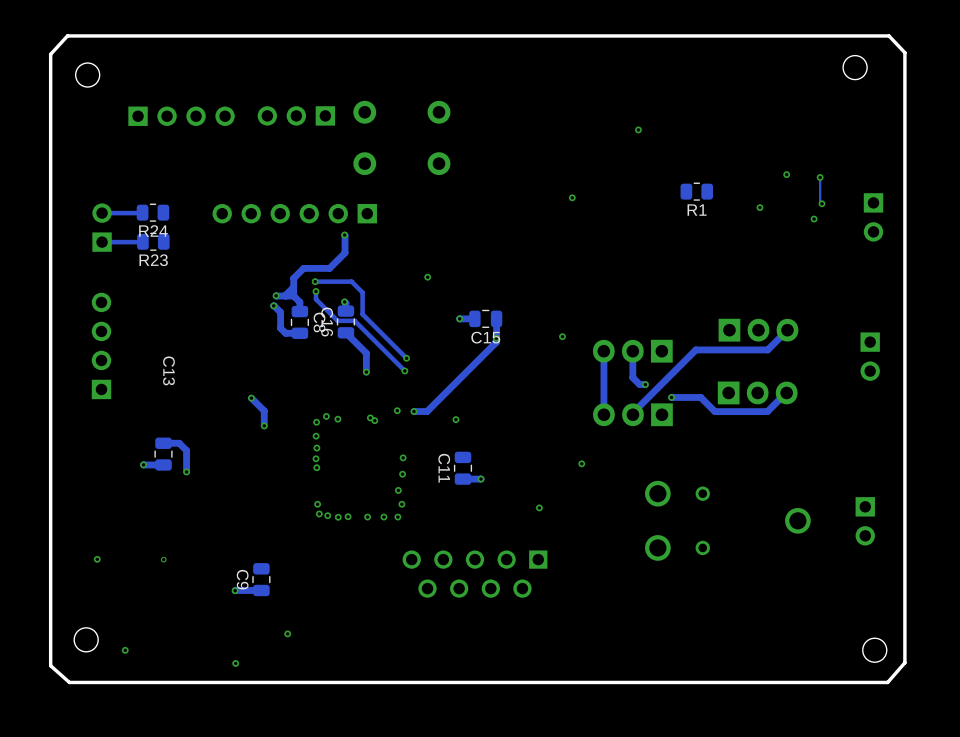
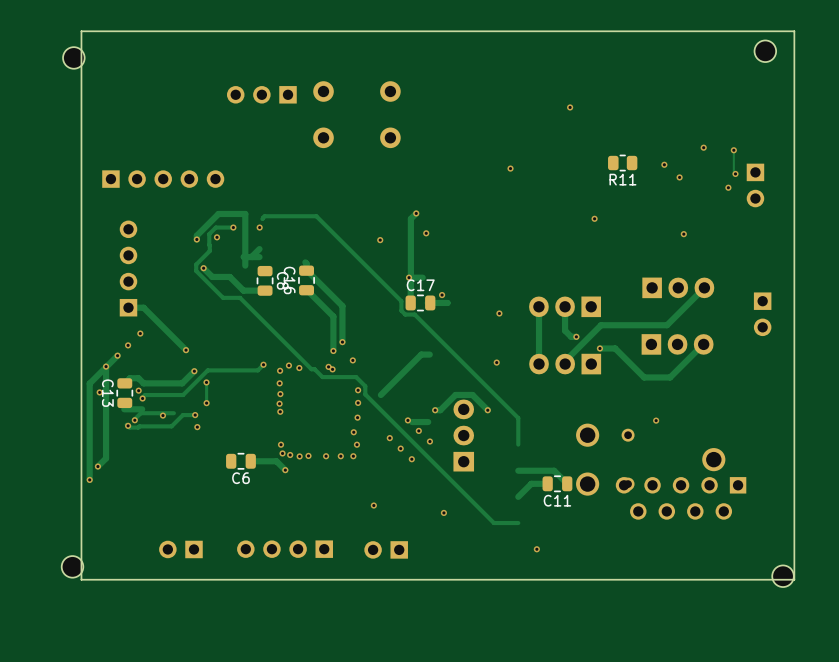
board edge: (889, 35) (67, 35) (50, 54) (50, 665) (69, 682) (887, 682) (904, 662) (904, 52) (889, 35) -> (794, 31) (794, 579) (81, 579) (81, 31) (794, 31)
part: (181, 116) -> none
via: none -> (664, 164)
part: none -> (163, 179)
R1 name: R1 (697, 210) -> R11 (622, 179)
track: (142, 212) (102, 213) -> none
R24: (153, 212) -> none
part: (294, 213) -> none
part position: (873, 217) -> (755, 185)
part: (102, 227) -> none
track: (344, 235) (345, 252) (329, 268) (303, 268) (293, 278) (293, 296) (299, 302) (299, 311) -> none
via: (344, 235) -> none
track: (142, 241) (102, 242) -> none
R23: (153, 241) -> none
track: none -> (416, 213) (410, 218) (410, 302)
via: none -> (416, 213)
track: none -> (262, 219) (264, 216) (316, 216) (401, 301) (401, 310) (405, 314) (414, 314) (518, 418) (518, 444)
via: none -> (594, 218)
track: none -> (233, 227) (215, 227) (209, 234) (209, 251) (196, 264) (196, 270) (223, 297) (240, 297) (311, 369) (314, 369) (322, 377) (356, 377) (365, 386) (365, 394) (493, 523) (518, 523)
via: none -> (233, 227)
via: none -> (259, 227)
via: none -> (426, 233)
via: none -> (683, 234)
via: none -> (217, 237)
track: none -> (196, 239) (196, 235) (218, 213) (245, 213) (245, 265)
via: none -> (196, 239)
track: (315, 281) (351, 281) (362, 292) (362, 314) (406, 358) -> none
via: (315, 281) -> none
track: (315, 291) (315, 299) (337, 320) (354, 320) (404, 370) -> none
via: (315, 291) -> none
via: (276, 295) -> none
via: (344, 301) -> none
track: (273, 305) (280, 312) (280, 328) (285, 333) -> (203, 268) (212, 276) (229, 276) (243, 290) (252, 290)
via: (273, 305) -> none
via: none -> (203, 268)
track: none -> (307, 271) (342, 306) (342, 342)
C15: (485, 318) -> none
track: (496, 318) (496, 342) (427, 411) (413, 411) -> none
track: (345, 332) (366, 353) (366, 372) -> none
track: none -> (307, 290) (333, 316) (333, 350)
via position: (562, 336) -> (499, 313)
part position: (101, 345) -> (128, 268)
C17: none -> (420, 302)
track: none -> (447, 302) (427, 302)
track: (767, 349) (695, 349) (632, 412) -> (686, 305) (667, 325) (601, 325) (565, 362)
track: none -> (128, 307) (143, 307) (186, 350)
part position: (870, 356) -> (762, 314)
via: (406, 358) -> none
C13 name position: C13 (168, 370) -> C13 (107, 393)
via: (404, 370) -> none
via: (366, 372) -> none
via: none -> (140, 333)
via: none -> (342, 342)
via: none -> (128, 345)
track: (688, 397) (700, 397) (714, 411) (767, 411) -> (615, 348) (644, 377) (670, 377) (686, 361)
track: (251, 398) (264, 410) (264, 425) -> none
via: (251, 398) -> none
via: none -> (186, 350)
via: none -> (333, 350)
track: none -> (429, 354) (421, 354) (380, 395)
track: none -> (117, 355) (89, 383) (89, 479)
via: none -> (117, 355)
via: (413, 411) -> none
via: none -> (496, 362)
track: none -> (263, 364) (257, 370) (207, 370) (183, 395) (145, 395) (142, 398)
via: none -> (263, 364)
track: none -> (106, 366) (106, 458) (97, 466)
via: none -> (106, 366)
via: (455, 419) -> none
track: none -> (194, 371) (182, 383) (143, 383) (138, 378) (129, 378) (124, 383)
via: none -> (194, 371)
via: (264, 425) -> none
via: none -> (206, 382)
track: none -> (206, 382) (206, 403)
track: (163, 443) (179, 443) (186, 450) (186, 471) -> none
via: none -> (358, 390)
via: none -> (138, 390)
via: none -> (99, 392)
via: none -> (142, 398)
C13 position: (163, 454) -> (124, 393)
via: none -> (206, 403)
via: (581, 463) -> none
via: (143, 464) -> none
via: none -> (435, 410)
track: none -> (487, 410) (472, 394) (455, 394) (440, 410) (435, 410)
via: none -> (487, 410)
C11 name position: C11 (444, 468) -> C11 (557, 500)
C11 rotation: 0° (462, 468) -> 90° clockwise (557, 483)
C11 position: (462, 468) -> (557, 483)
track: none -> (173, 413) (140, 413) (134, 420)
track: none -> (195, 415) (182, 415) (171, 426) (129, 427) (126, 424)
via: none -> (195, 415)
via: none -> (134, 420)
via: none -> (407, 420)
via: none -> (656, 420)
via: (481, 479) -> none
via: none -> (128, 425)
via: none -> (197, 427)
via: none -> (418, 430)
part: none -> (463, 435)
via: none -> (389, 438)
via: none -> (429, 441)
via: (539, 507) -> none
via: none -> (400, 448)
via: none -> (411, 459)
part: (865, 521) -> none
C6: none -> (240, 461)
track: none -> (250, 461) (276, 461) (285, 470)
via: none -> (97, 466)
via: none -> (285, 470)
track: none -> (518, 470) (554, 470) (567, 483)
via: none -> (89, 479)
track: none -> (547, 483) (531, 483) (518, 496)
via: (97, 559) -> none
via: (163, 559) -> none
part: none -> (681, 498)
via: none -> (373, 505)
part: (474, 574) -> none
C9: (261, 579) -> none
via: none -> (443, 512)
via: (235, 590) -> none
track: (261, 590) (235, 590) -> none
part: none -> (180, 549)
part: none -> (285, 549)
via: none -> (536, 549)
part: none -> (386, 549)
via: (287, 633) -> none
via: (125, 650) -> none
via: (235, 663) -> none

